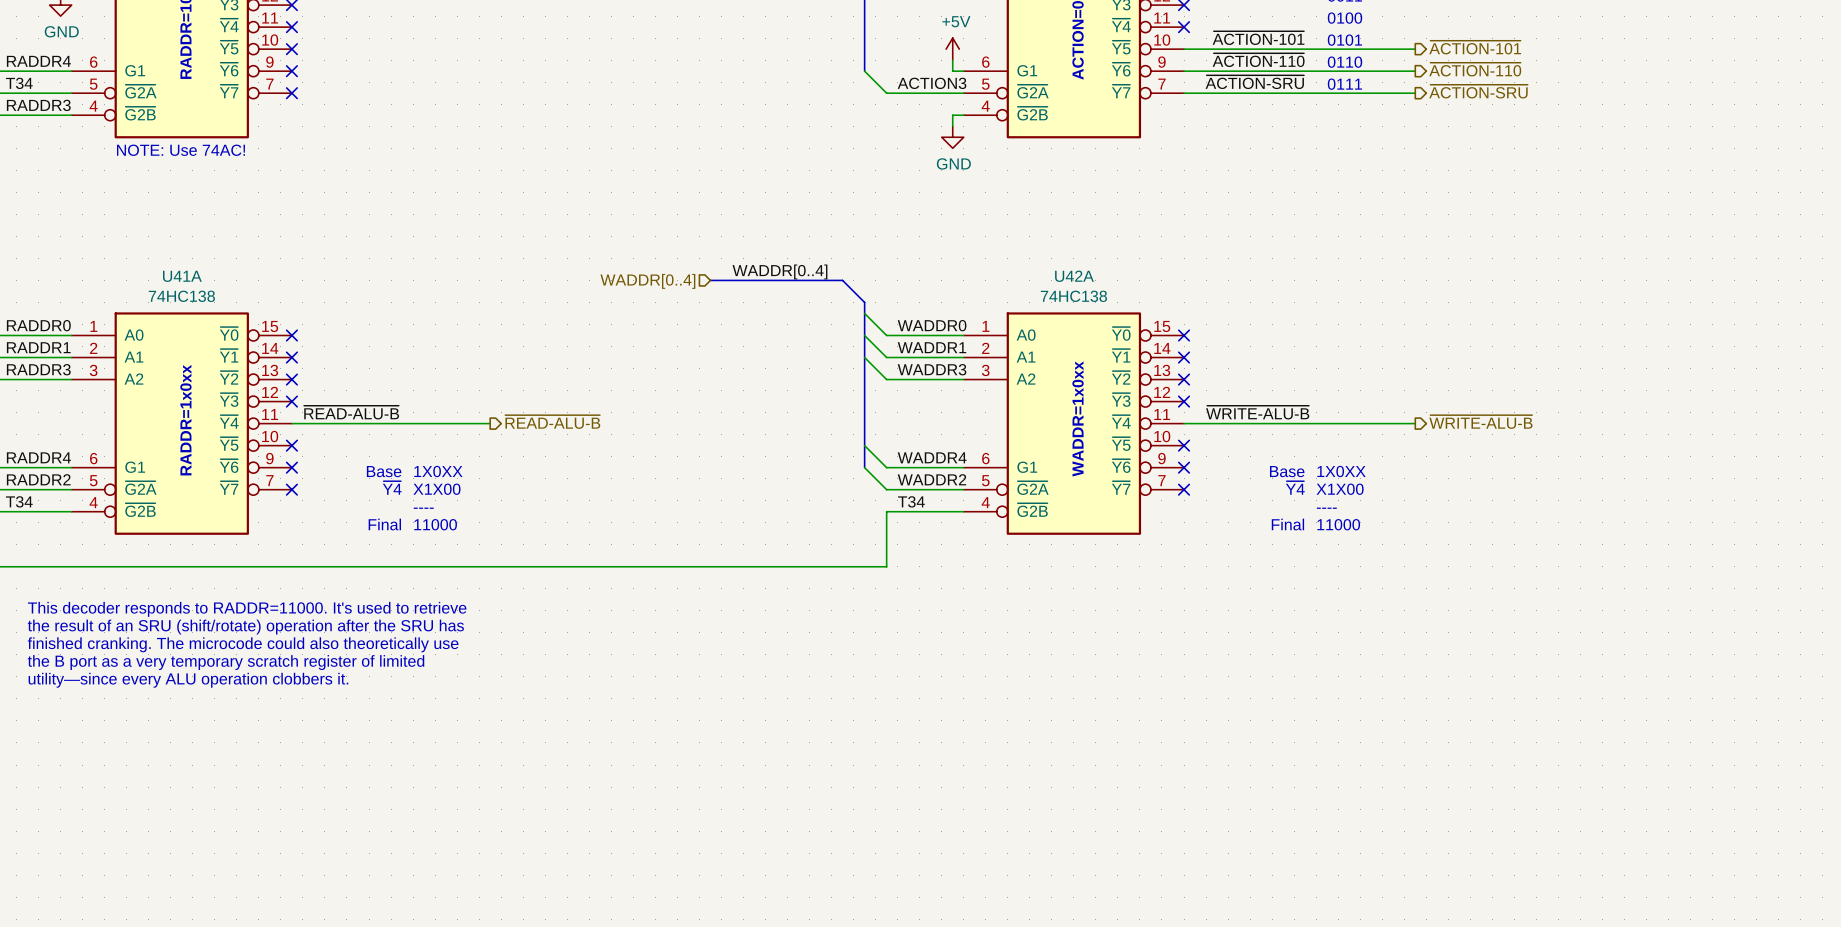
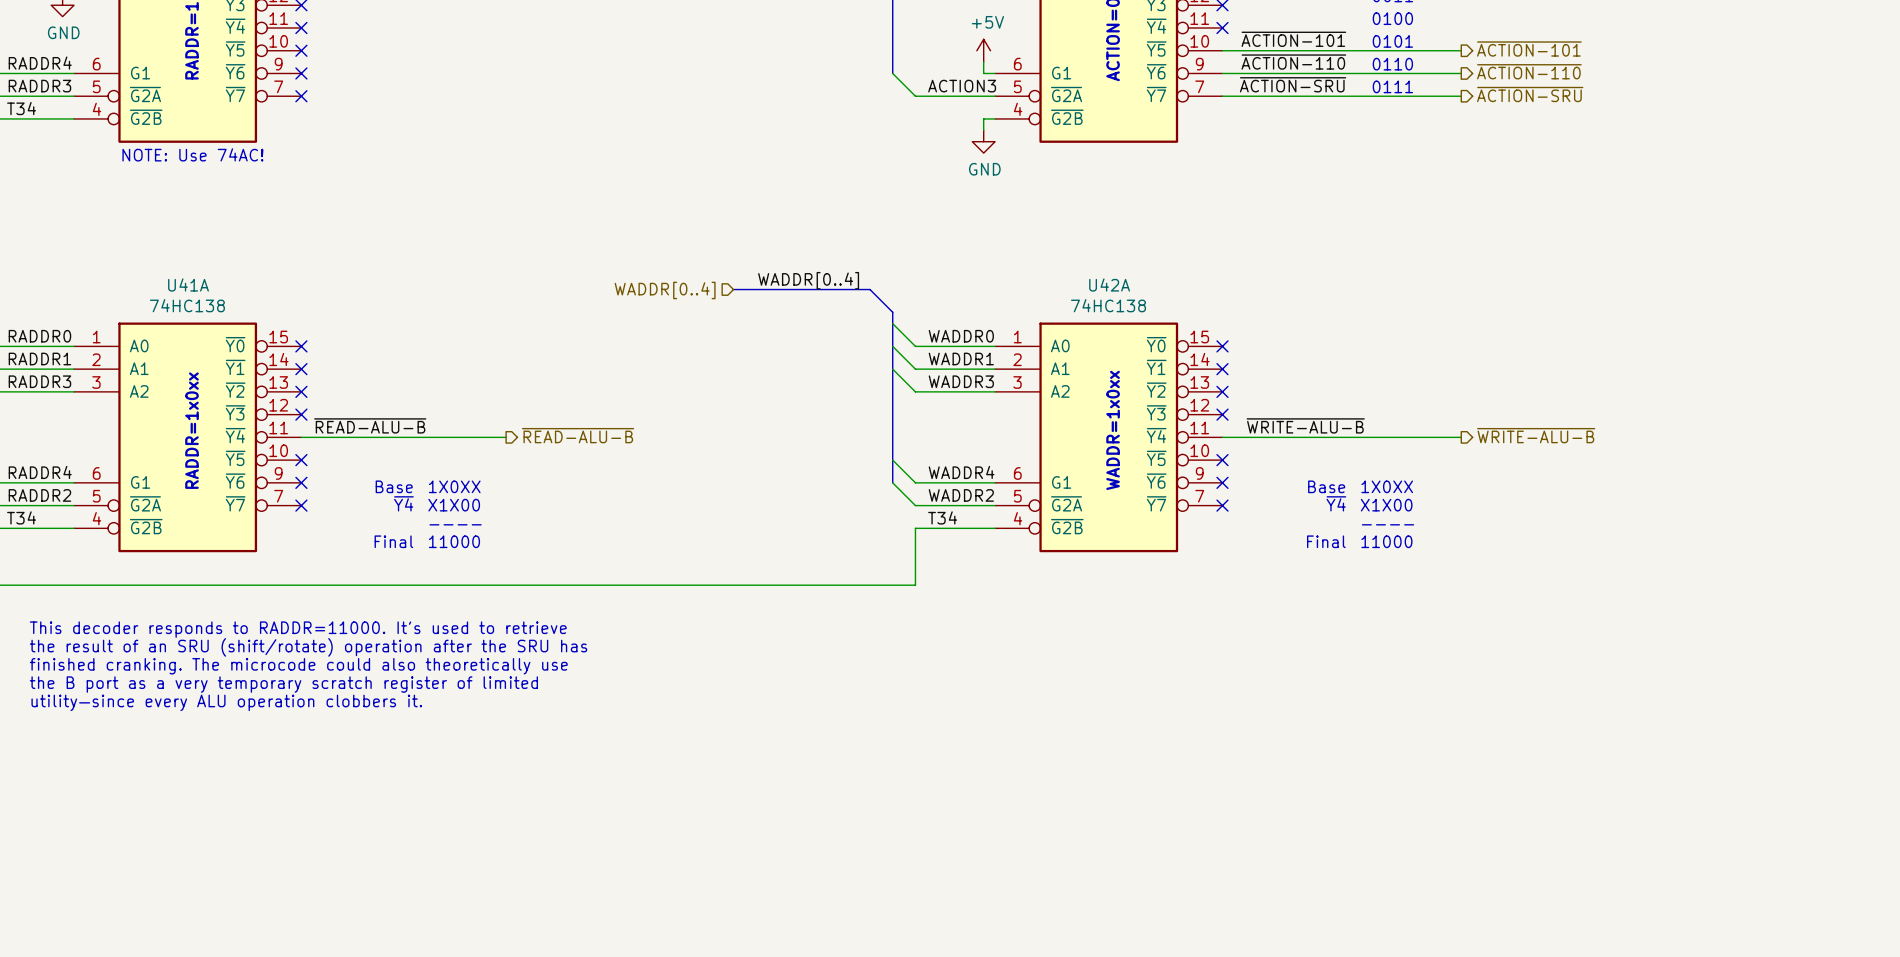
label: T34 (19, 83) -> RADDR3 (39, 86)
label: RADDR3 (38, 105) -> T34 (21, 108)

